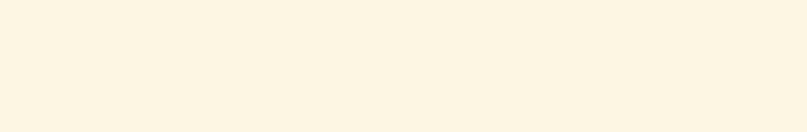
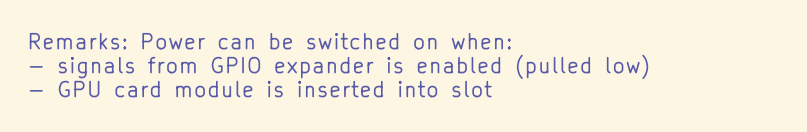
text: none -> Remarks: Power can be switched on when: (270, 41)
text: none -> - signals from GPIO expander is enabled (pulled low) (338, 66)
text: none -> - GPU card module is inserted into slot (260, 89)

